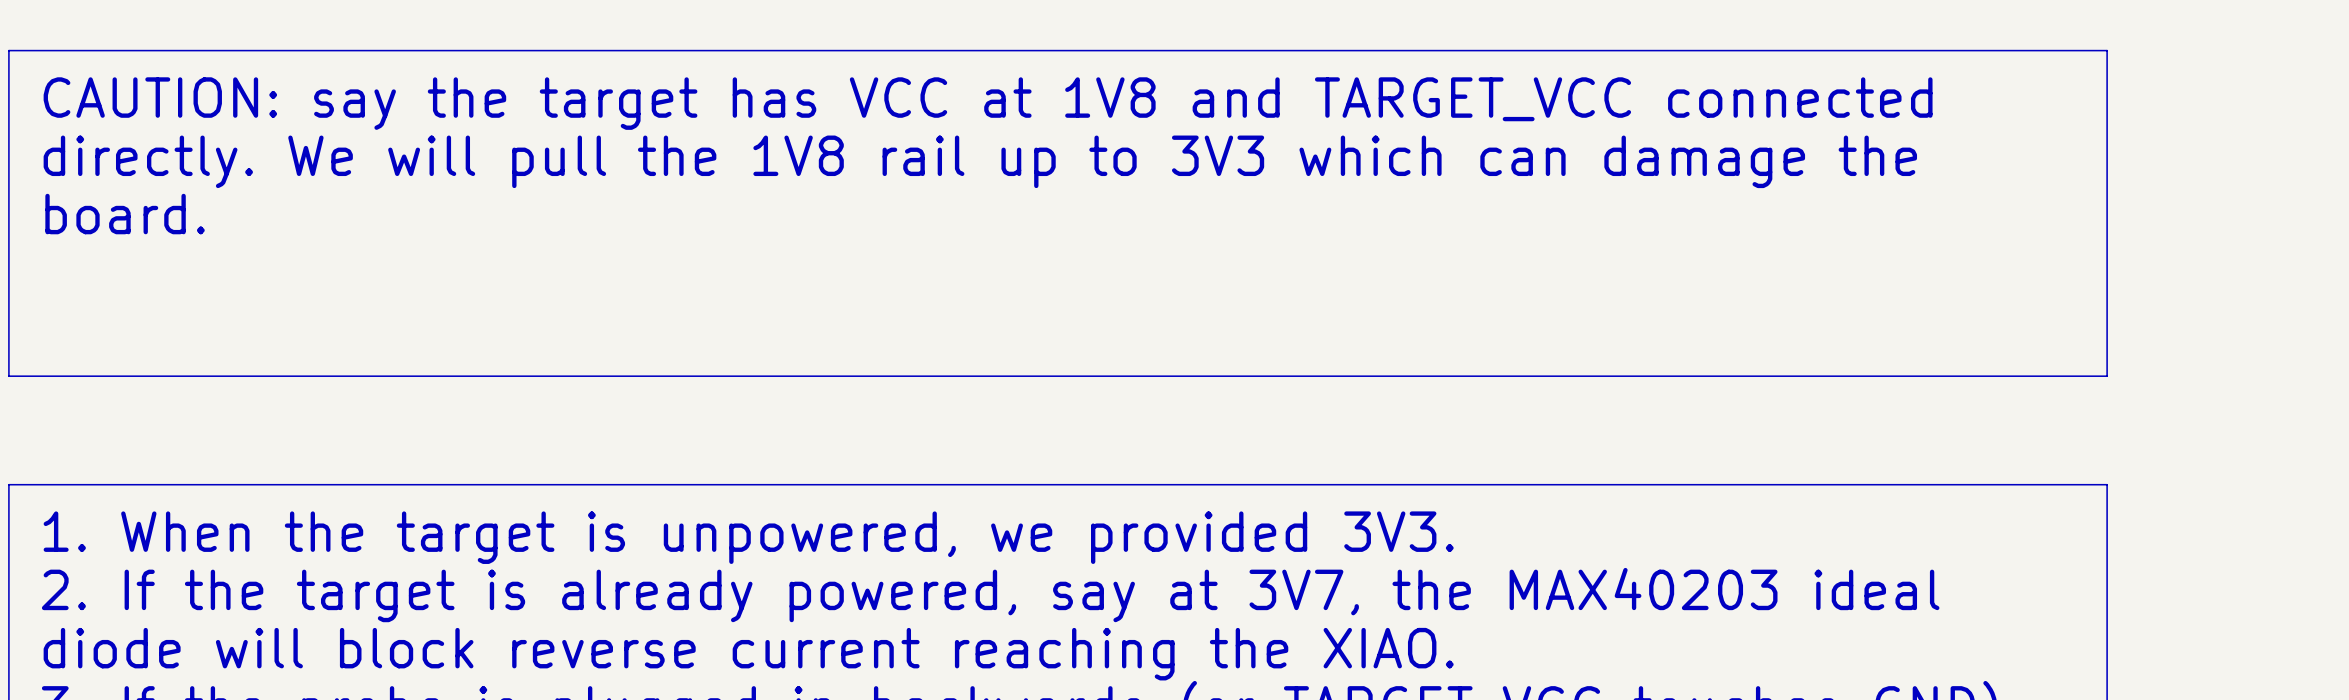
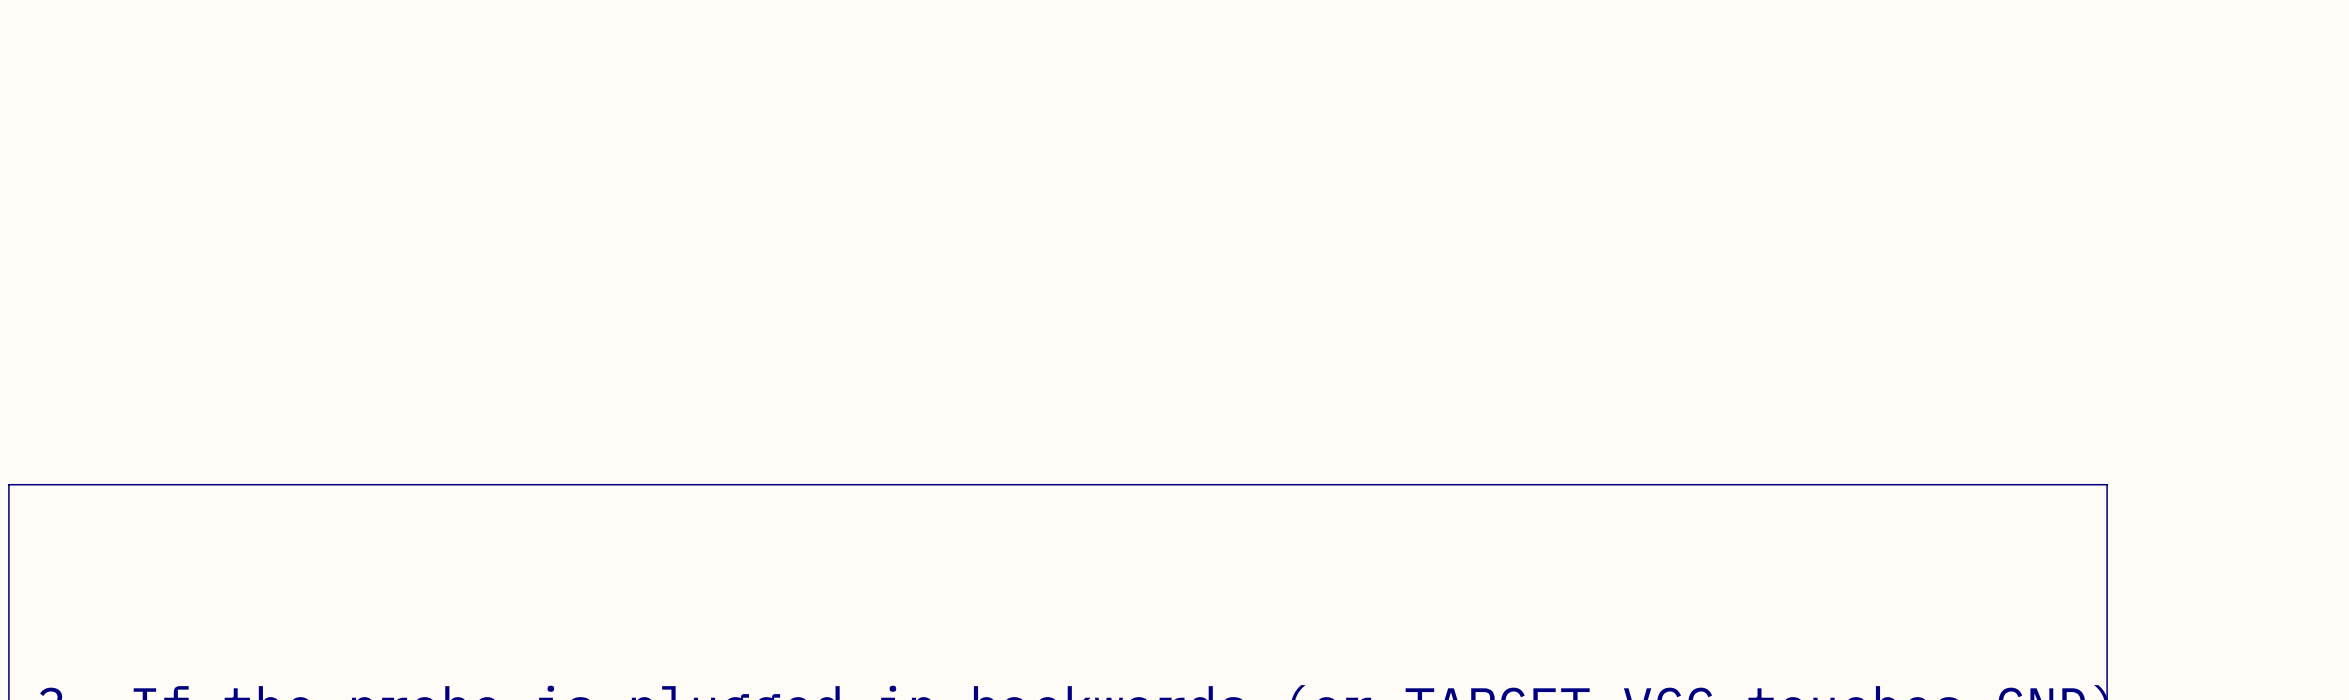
line: (8, 50) (2107, 50) (2107, 376) (8, 376) (8, 50) -> none
text: CAUTION: say the target has VCC at 1V8 and TARGET_VCC connected (988, 103) -> none
text: directly. We will pull the 1V8 rail up to 3V3 which can damage the (980, 161) -> none
text: board. (125, 214) -> none
text: 1. When the target is unpowered, we provided 3V3. (748, 537) -> none
text: 2. If the target is already powered, say at 3V7, the MAX40203 ideal (990, 595) -> none
text: diode will block reverse current reaching the XIAO. (748, 654) -> none

